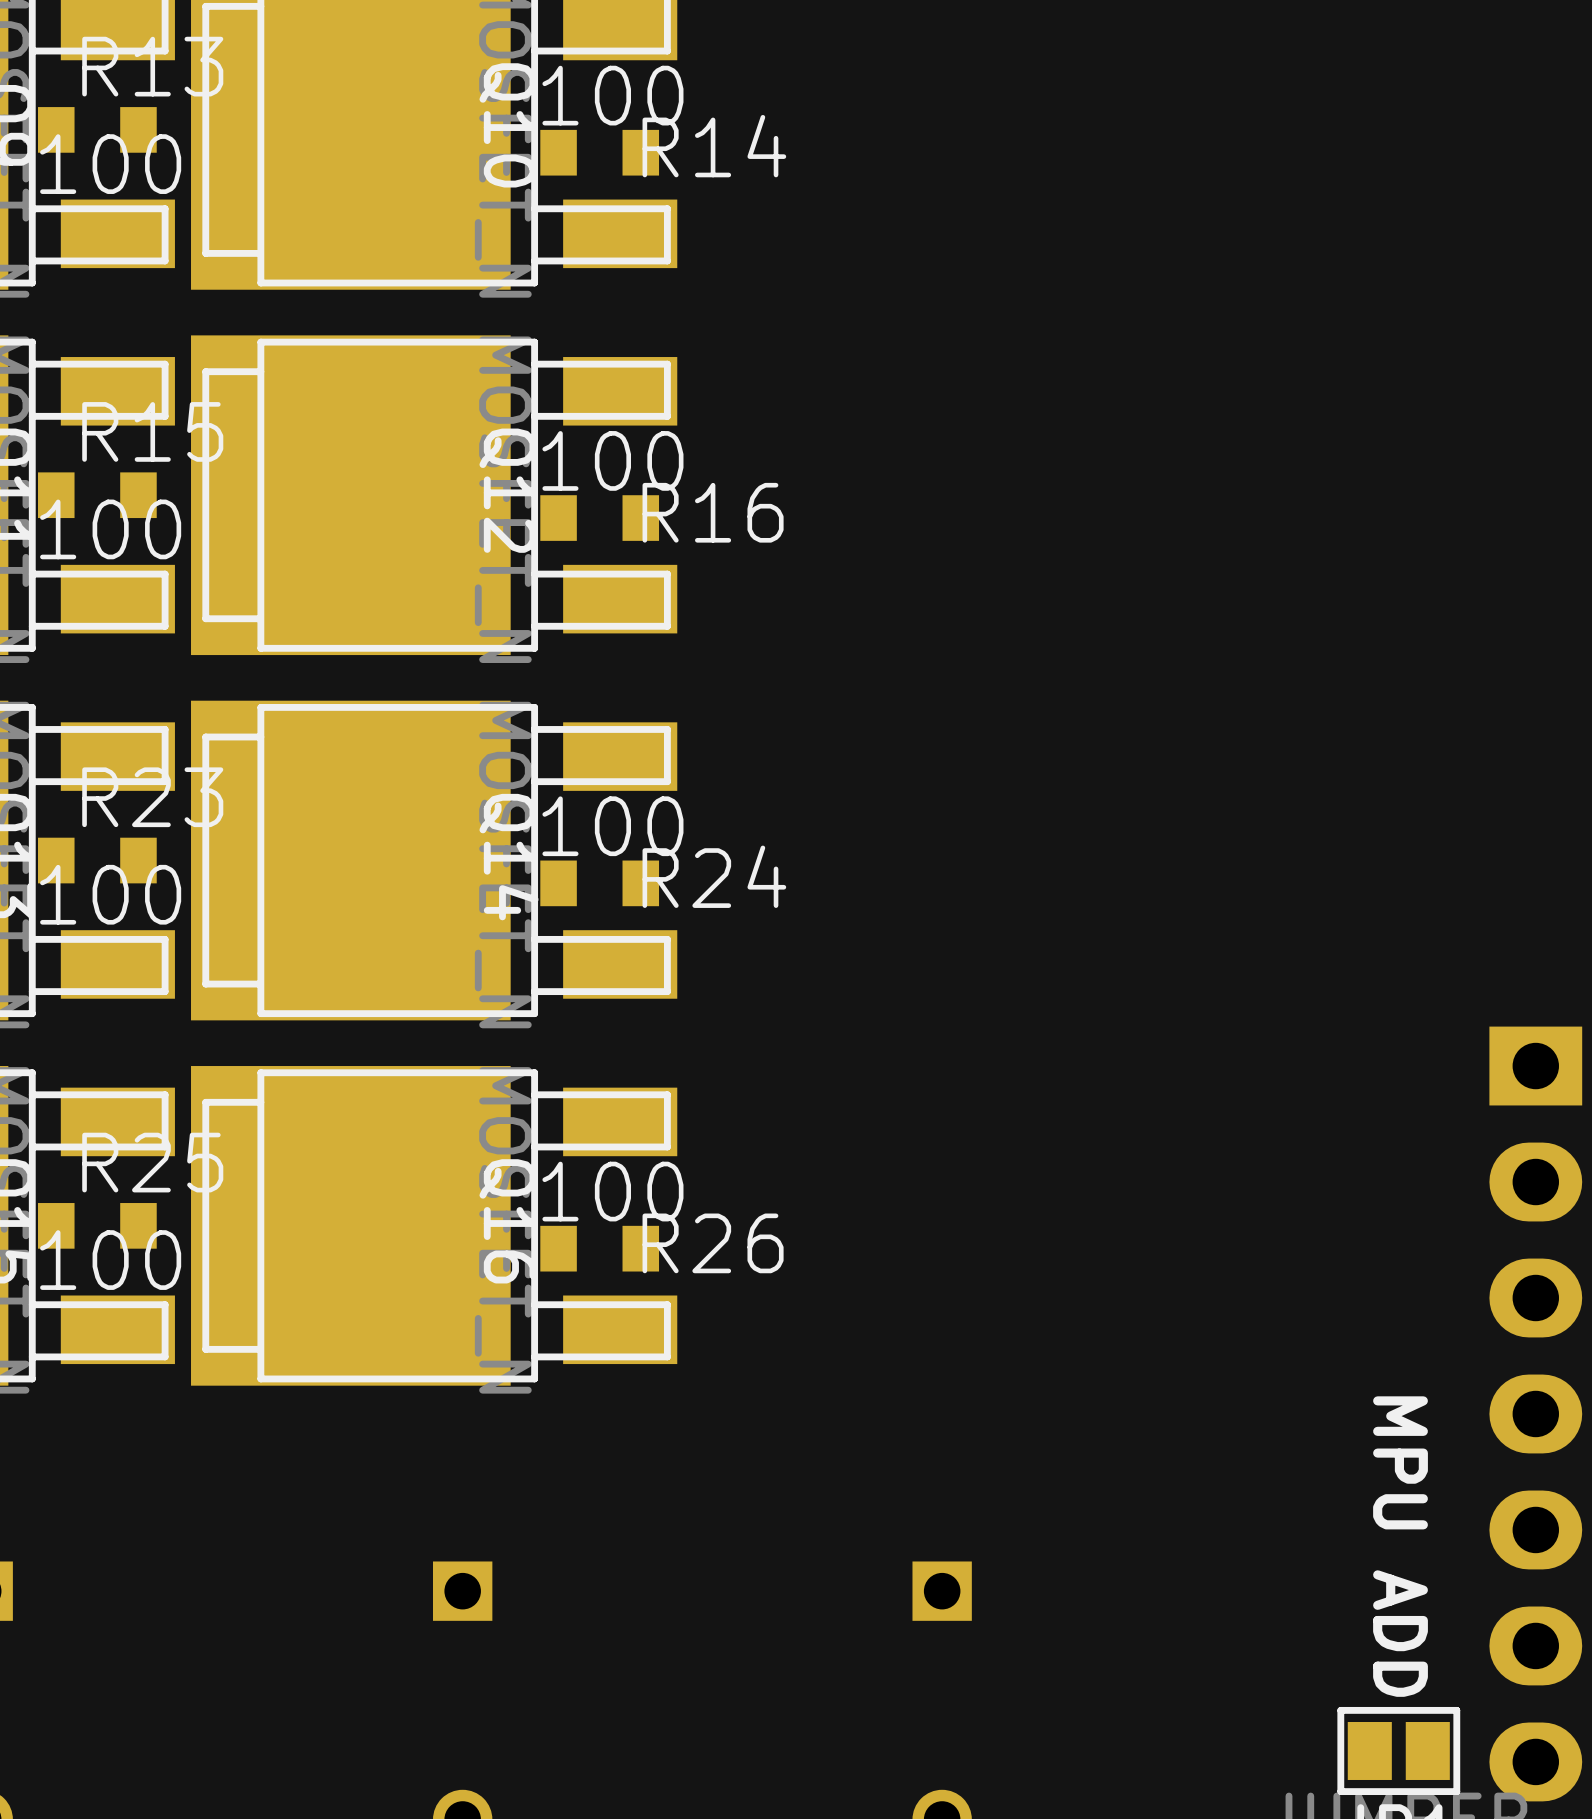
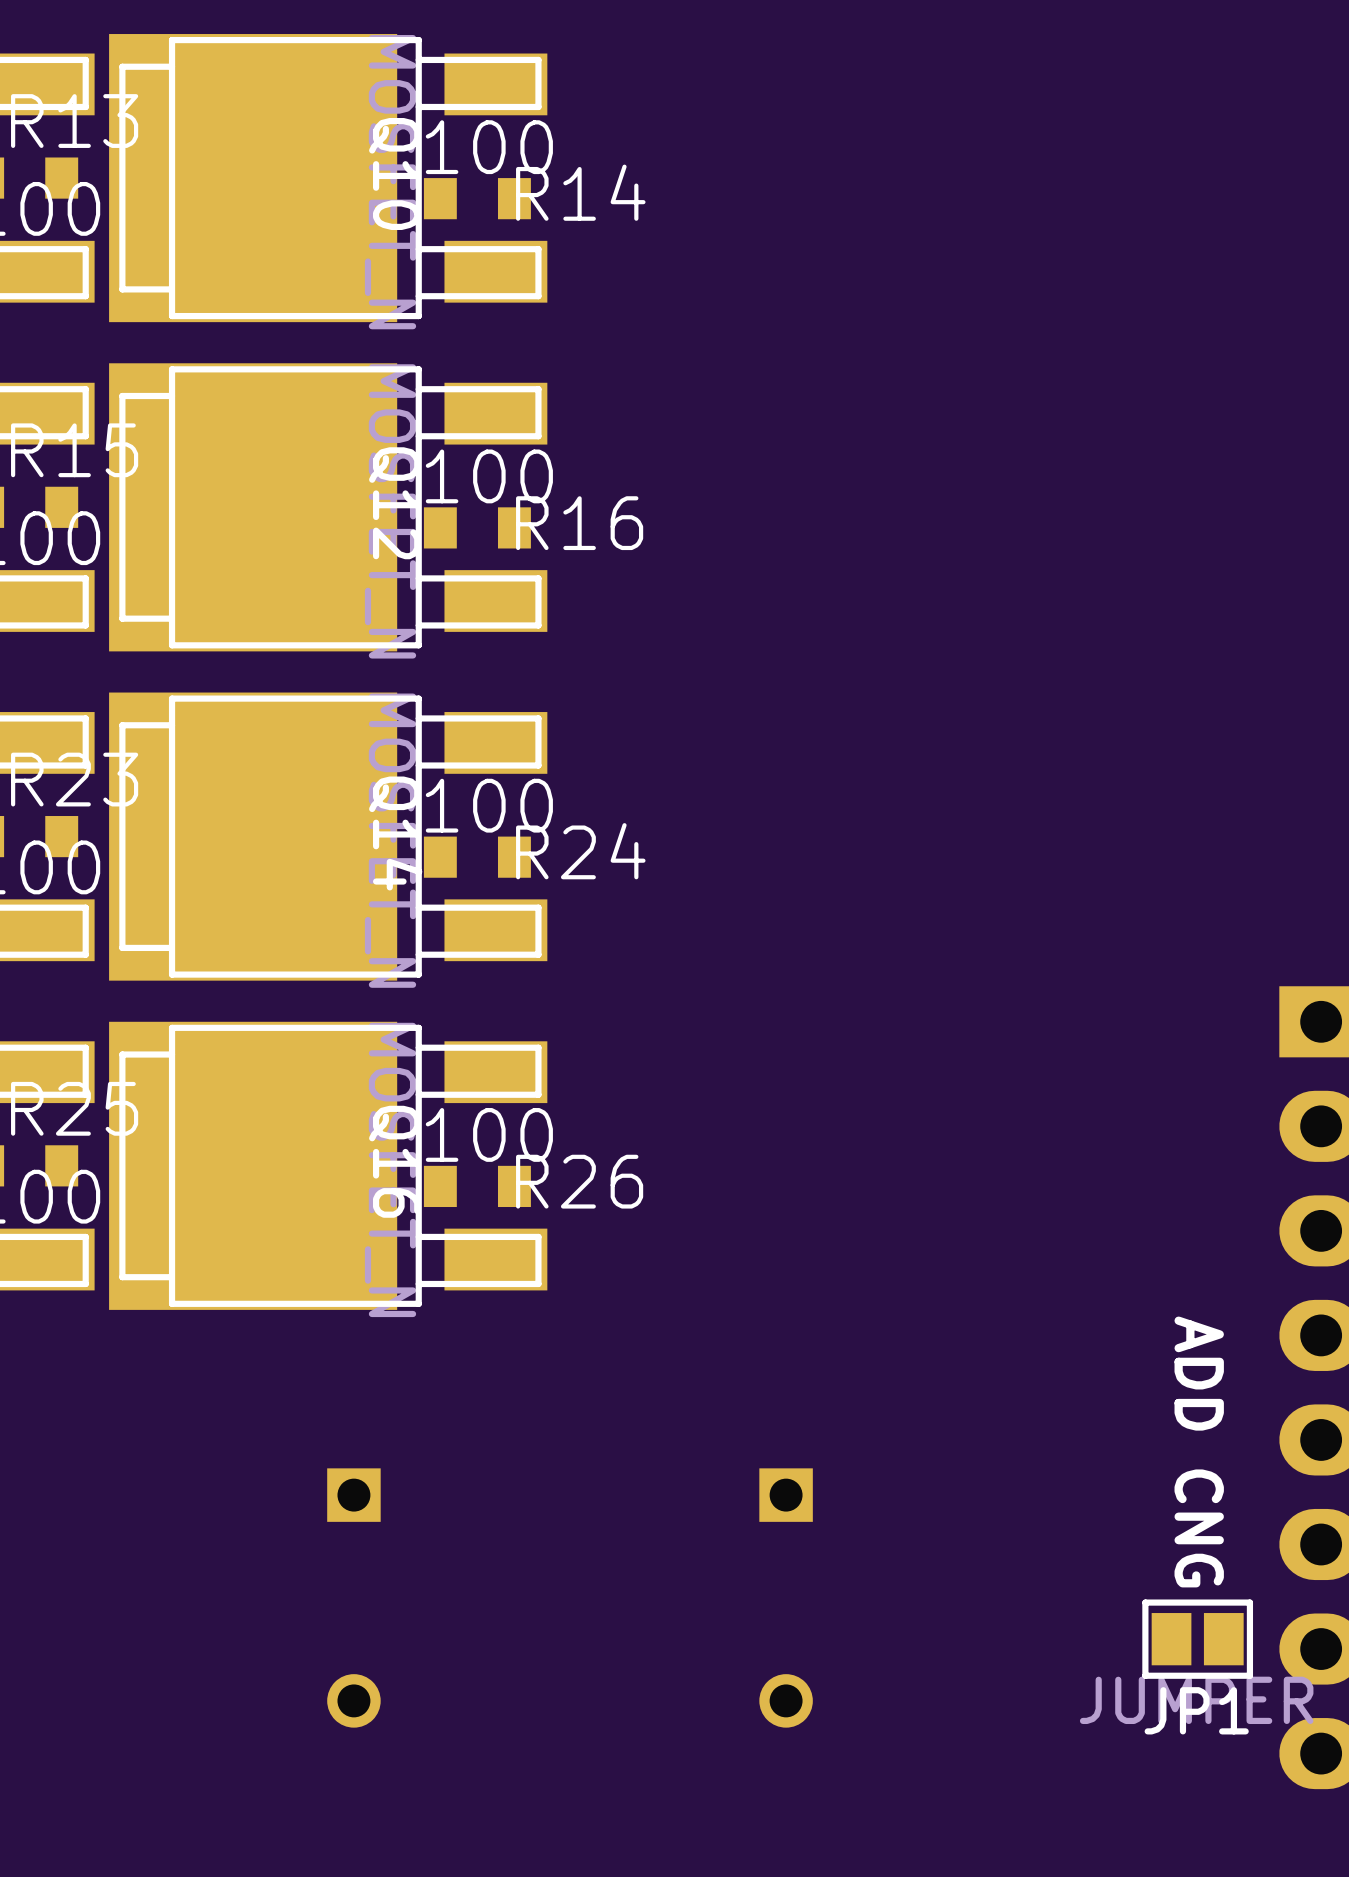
text: MPU ADD (1400, 1546) -> ADD CNG (1199, 1451)

